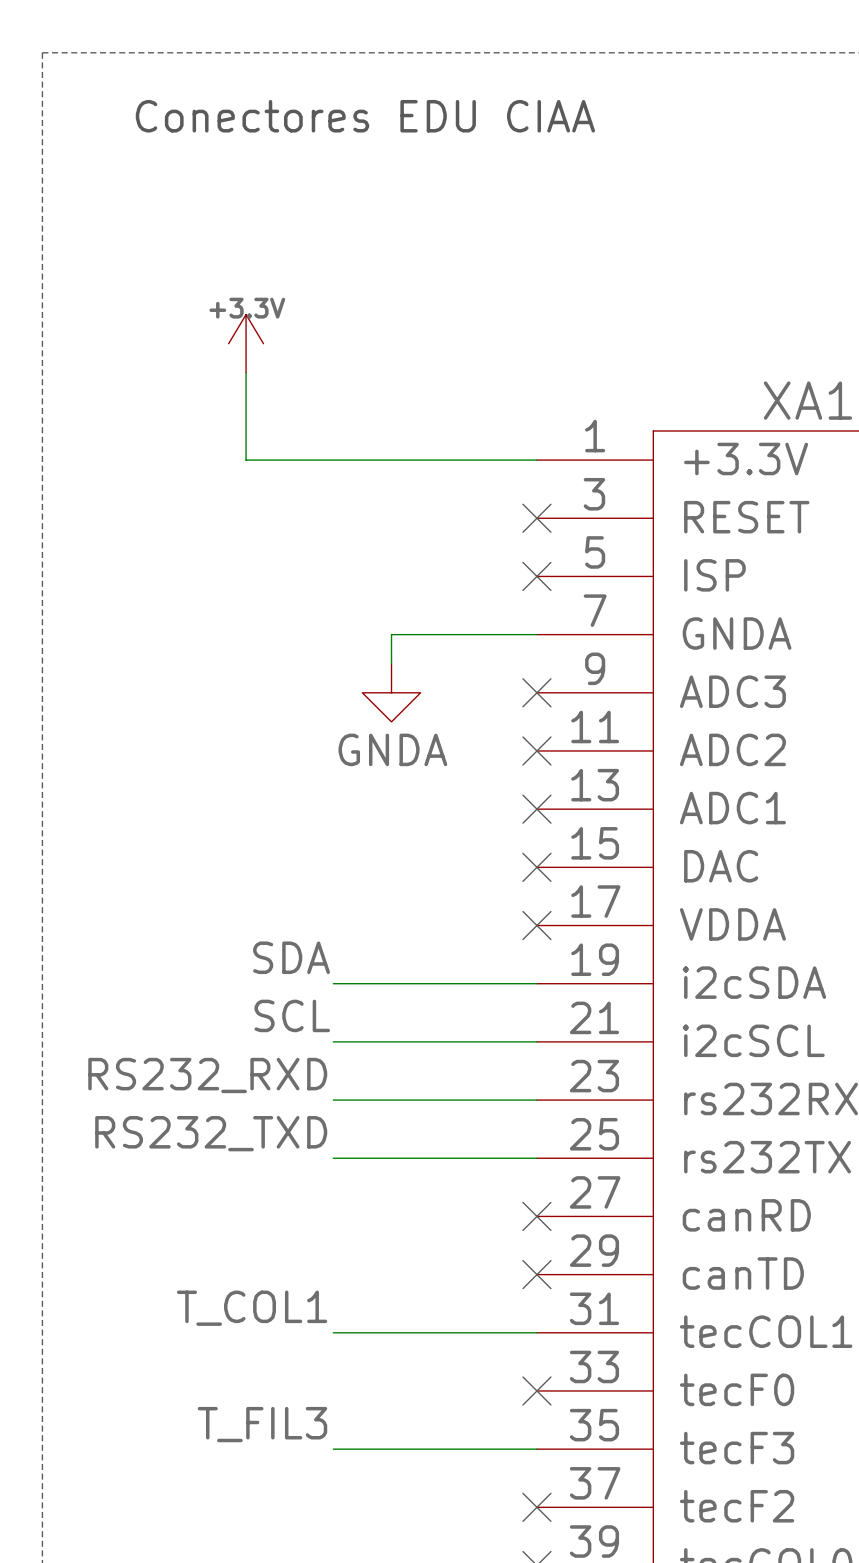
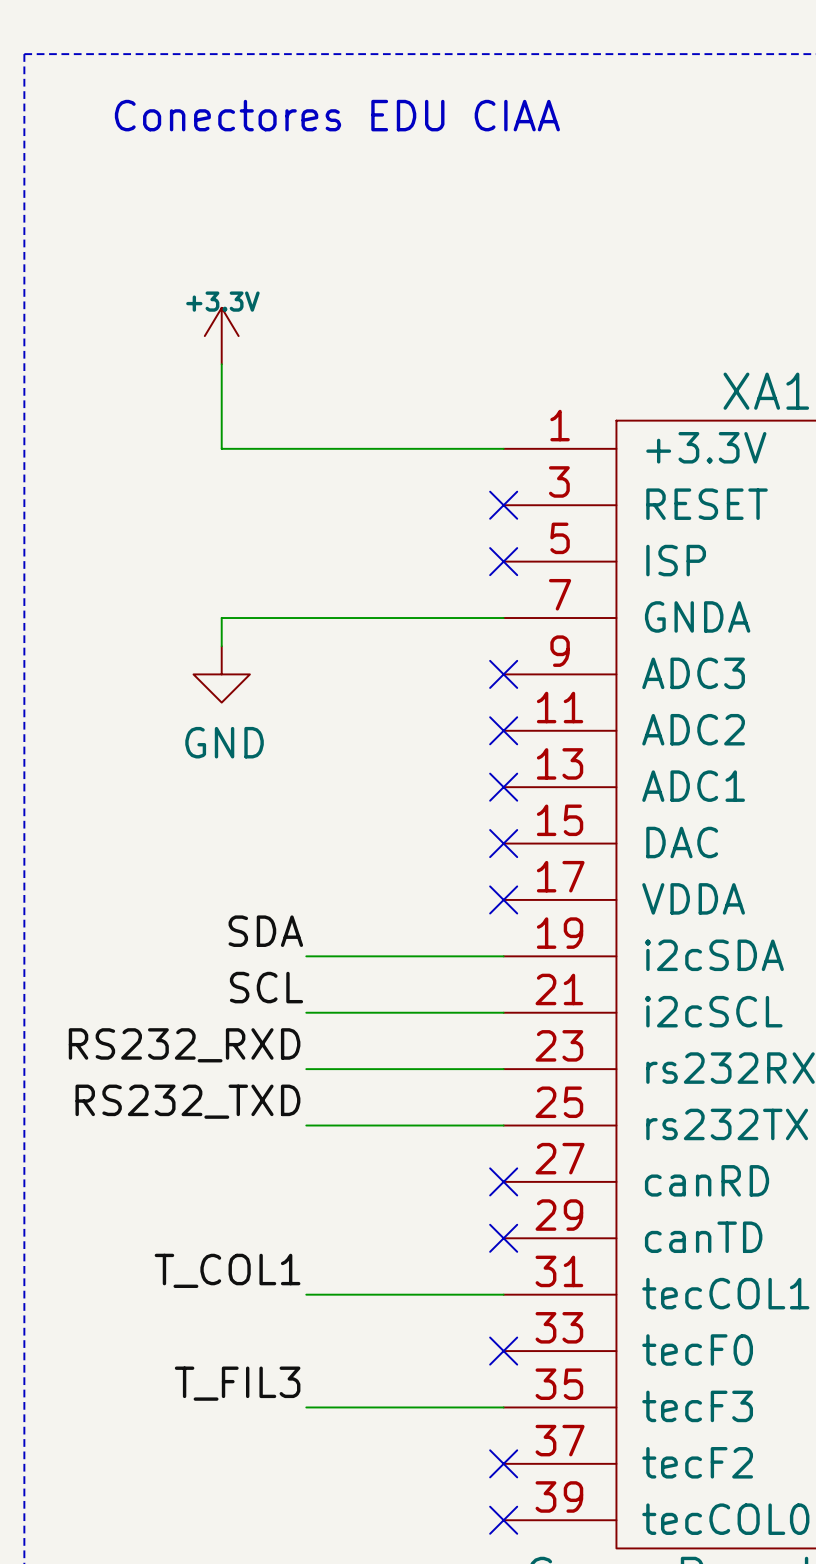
wire: (391, 634) (391, 663) -> (362, 618) (221, 618) (221, 646)
power symbol: none -> GND (221, 674)
power symbol: GNDA (391, 692) -> none

